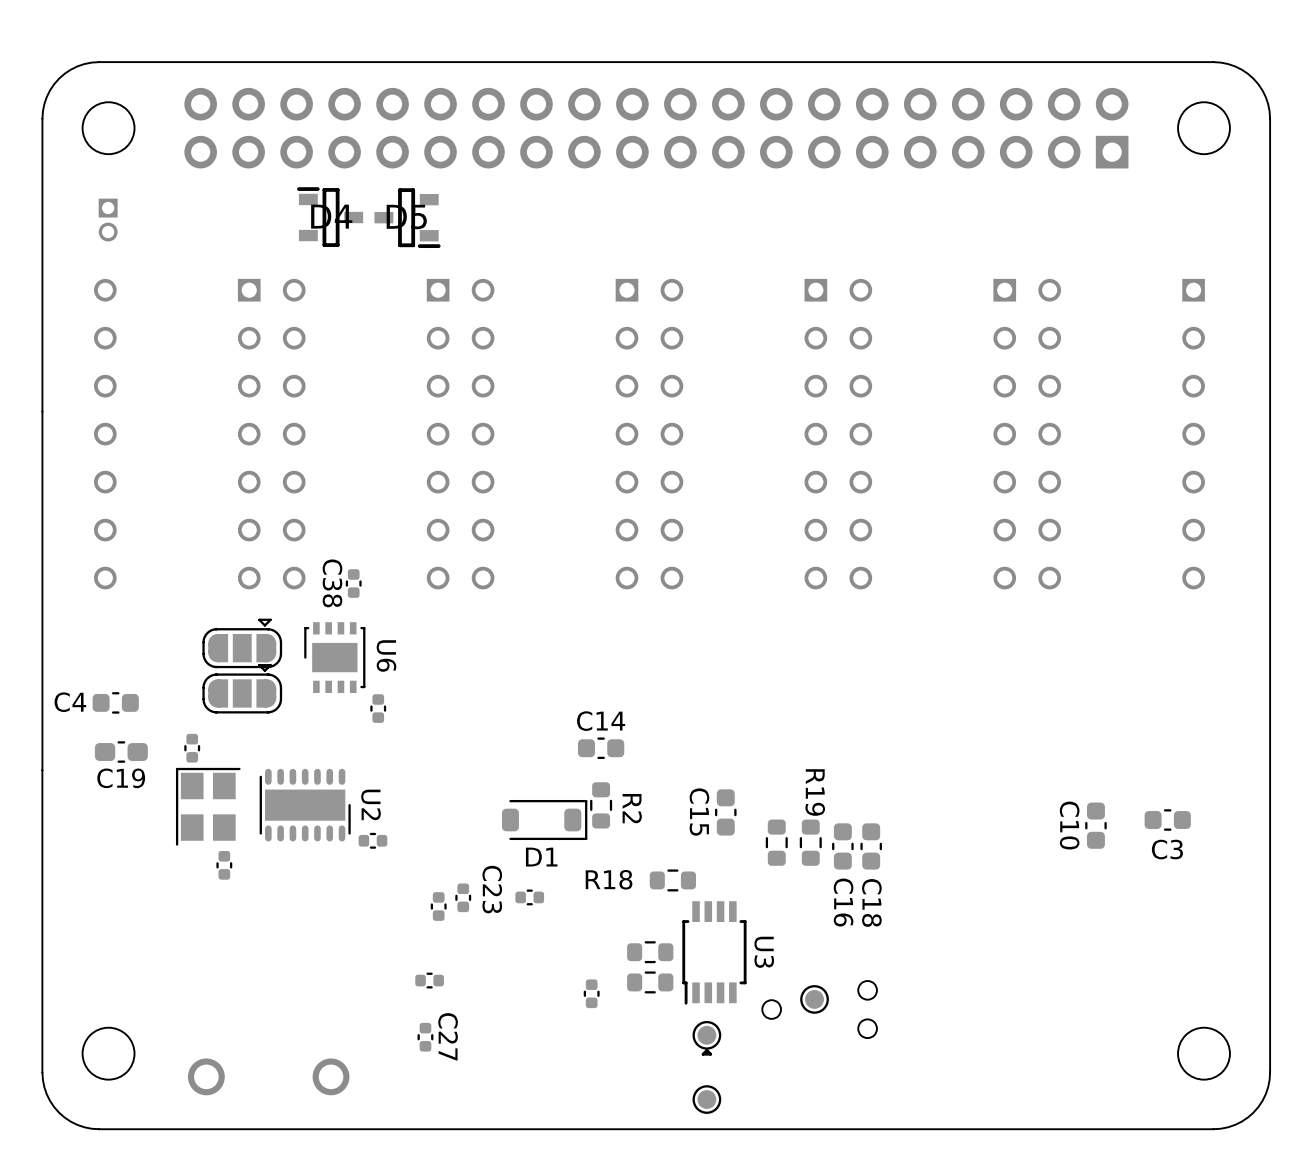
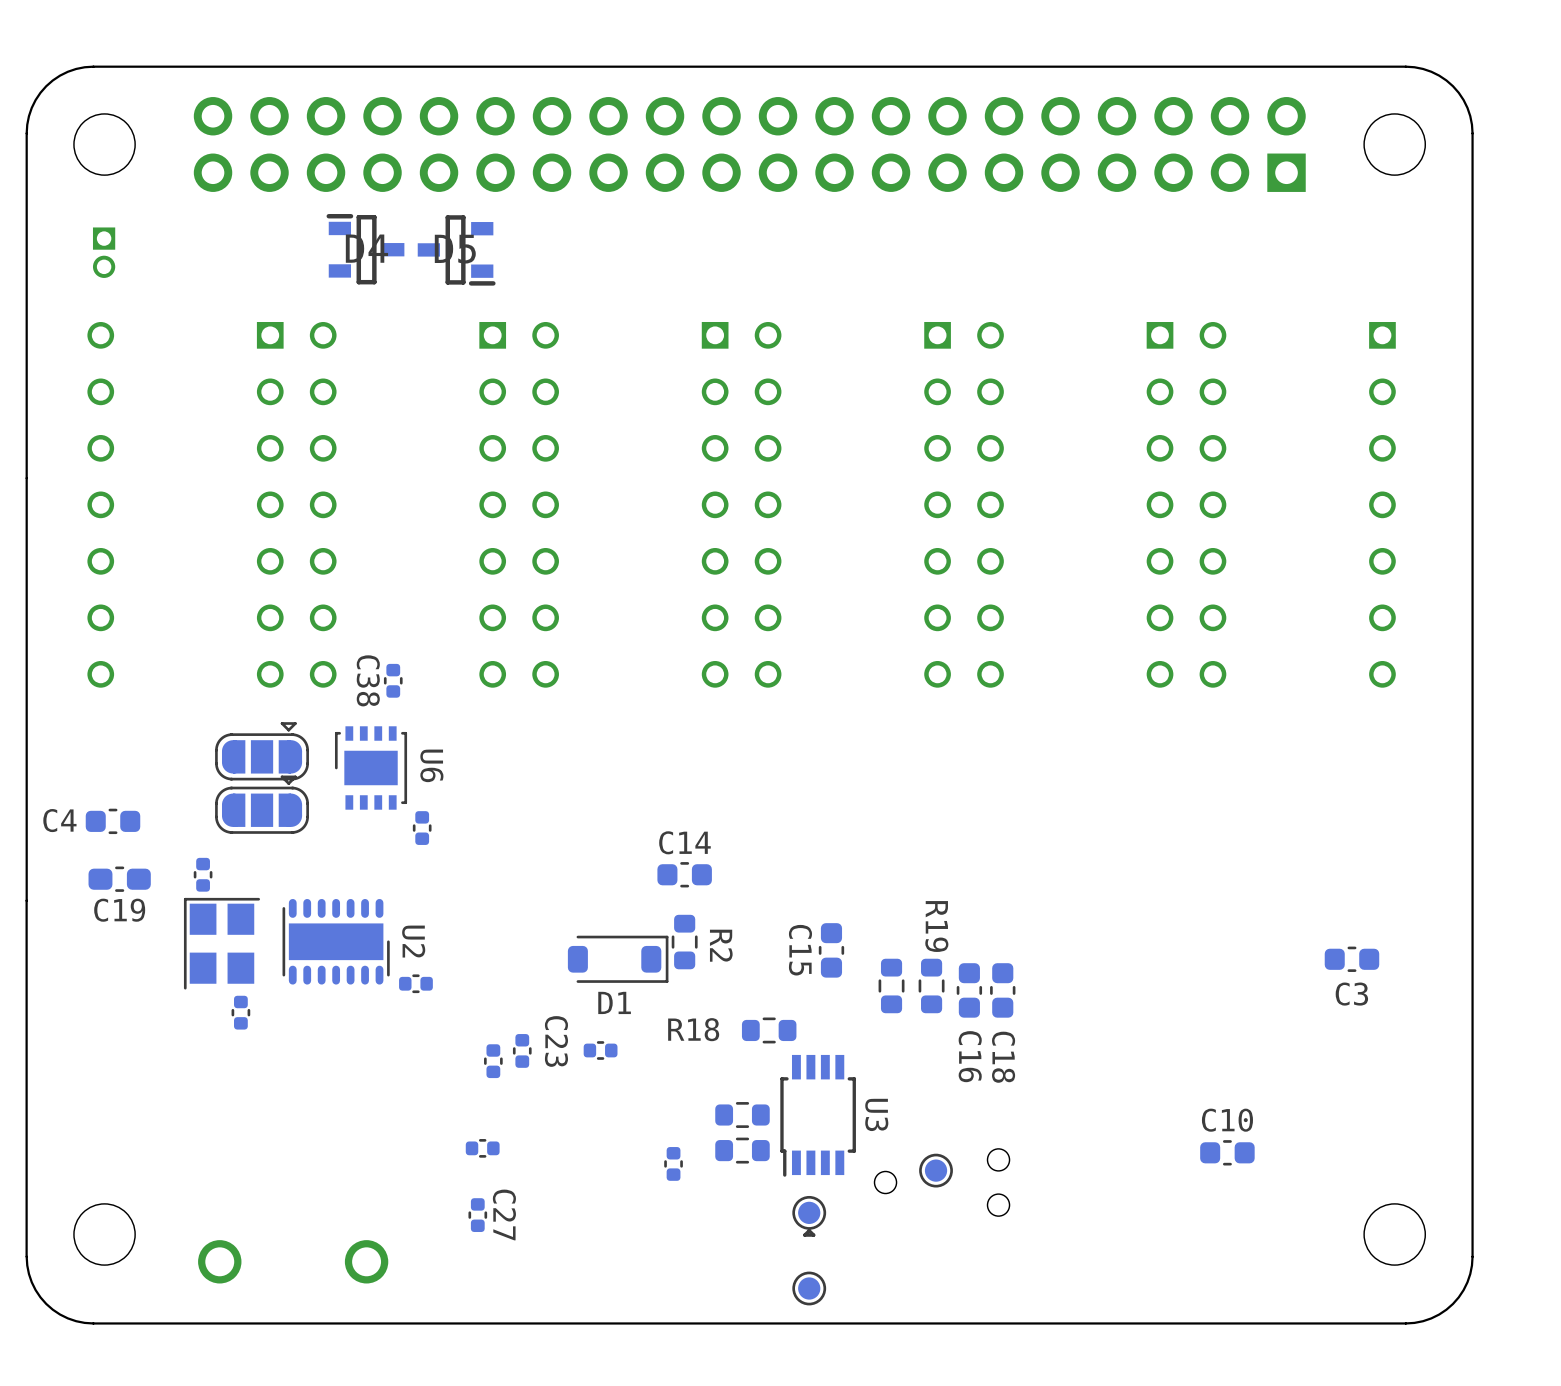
C10 rotation: 0° (1095, 825) -> 90° clockwise (1227, 1152)
C10 position: (1095, 825) -> (1227, 1152)

